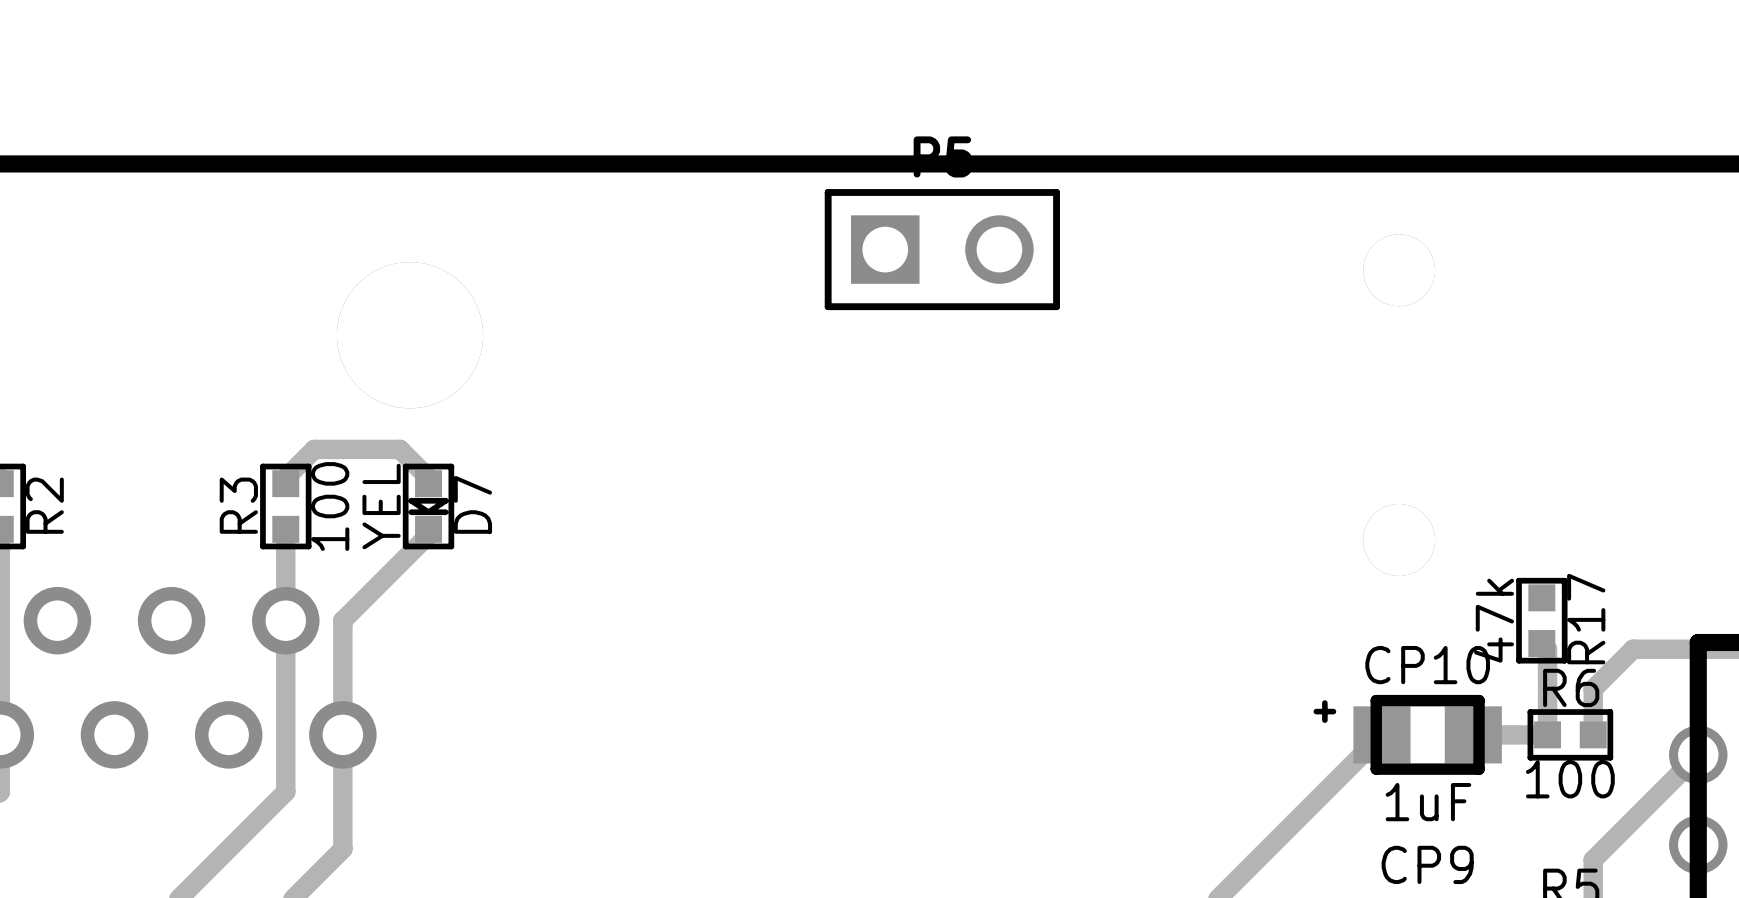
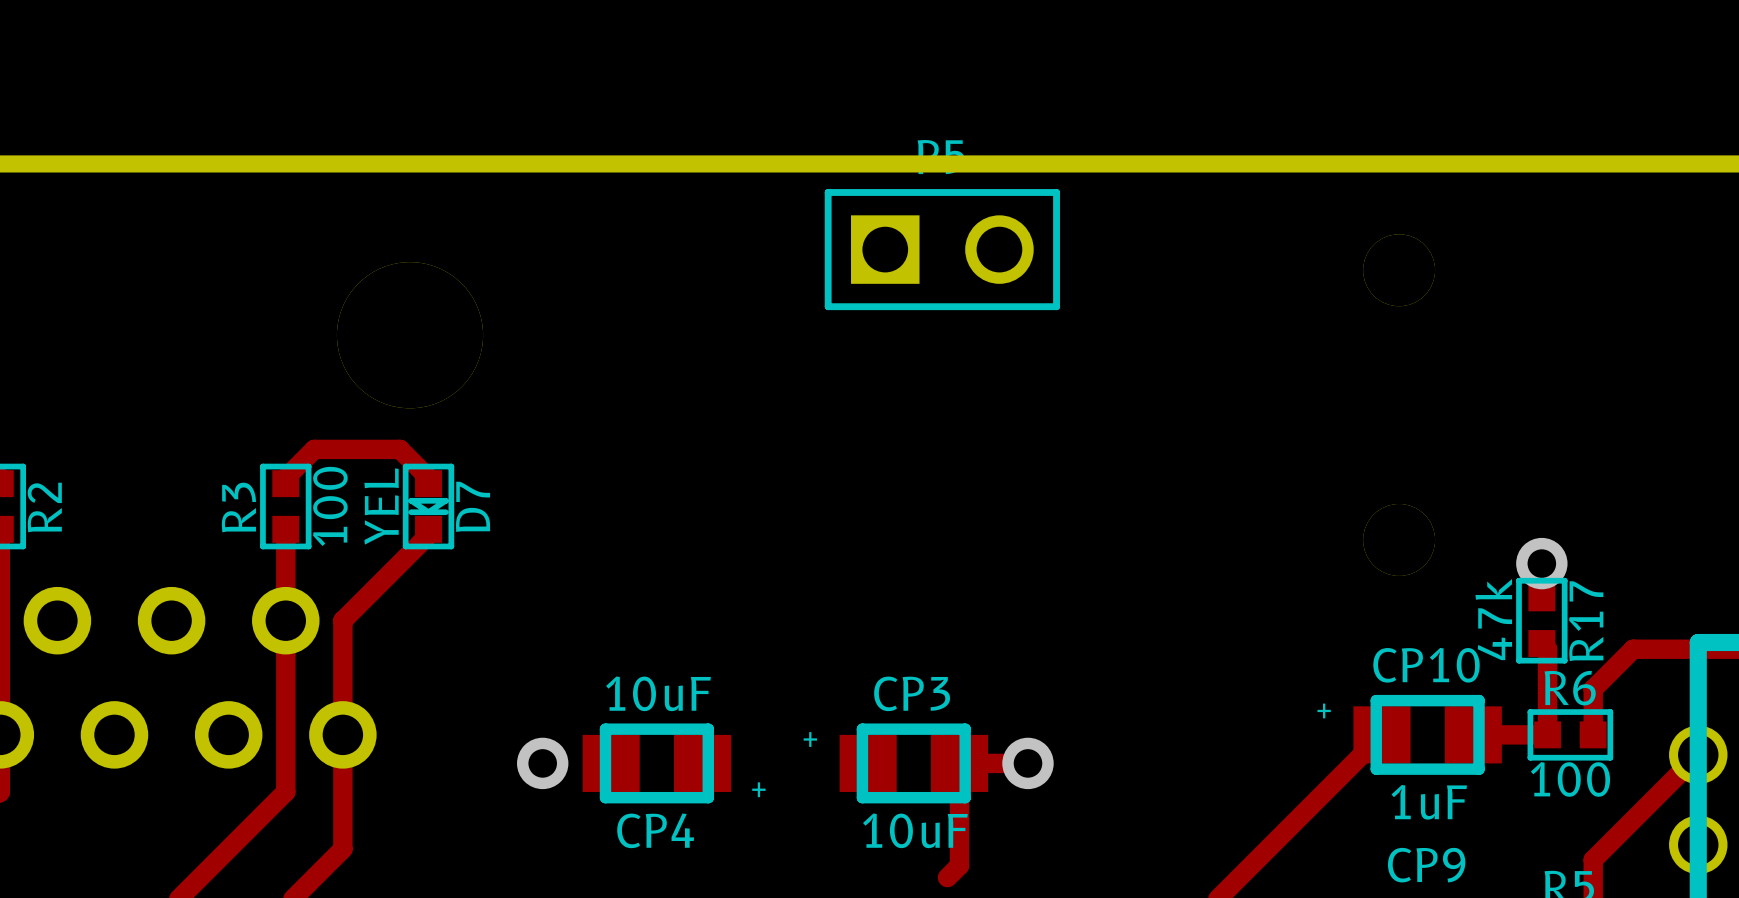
via: none -> (1541, 563)
via: none -> (542, 763)
CP4: none -> 10uF (656, 763)
CP3: none -> 10uF (913, 763)
track: none -> (1027, 763) (959, 763) (959, 865) (947, 877)
via: none -> (1027, 763)

